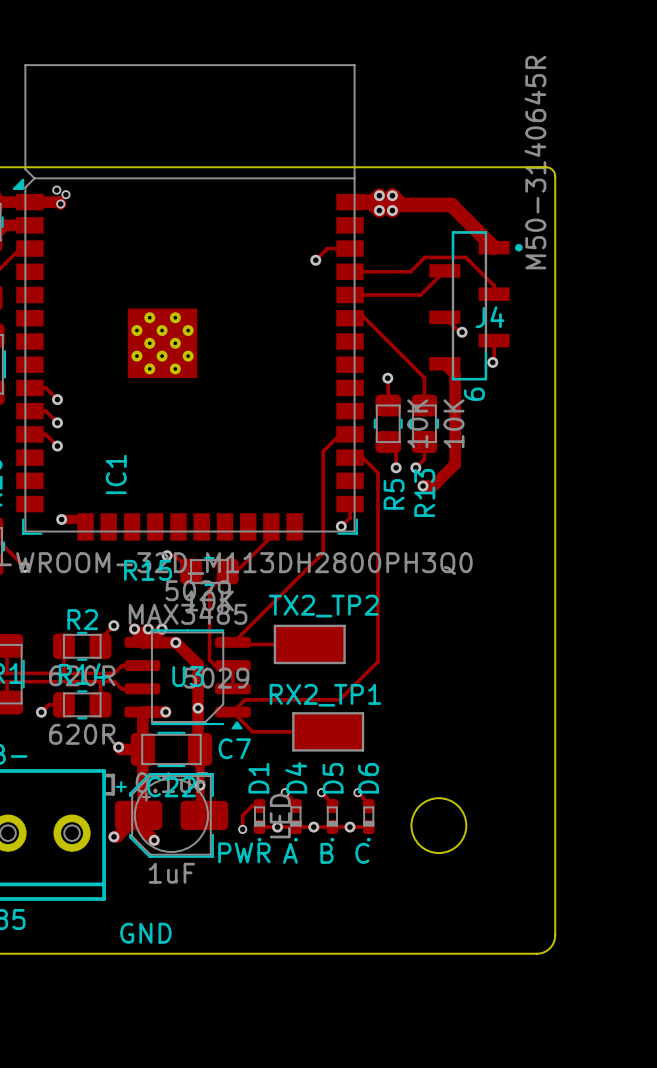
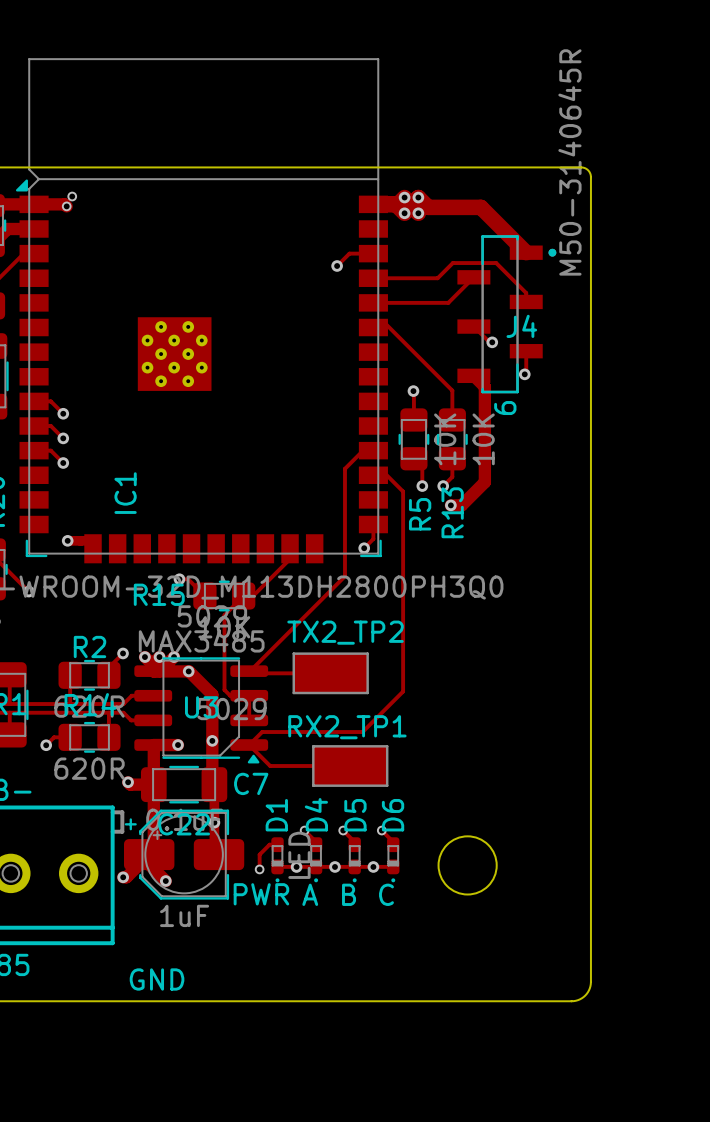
via: (56, 190) -> none

